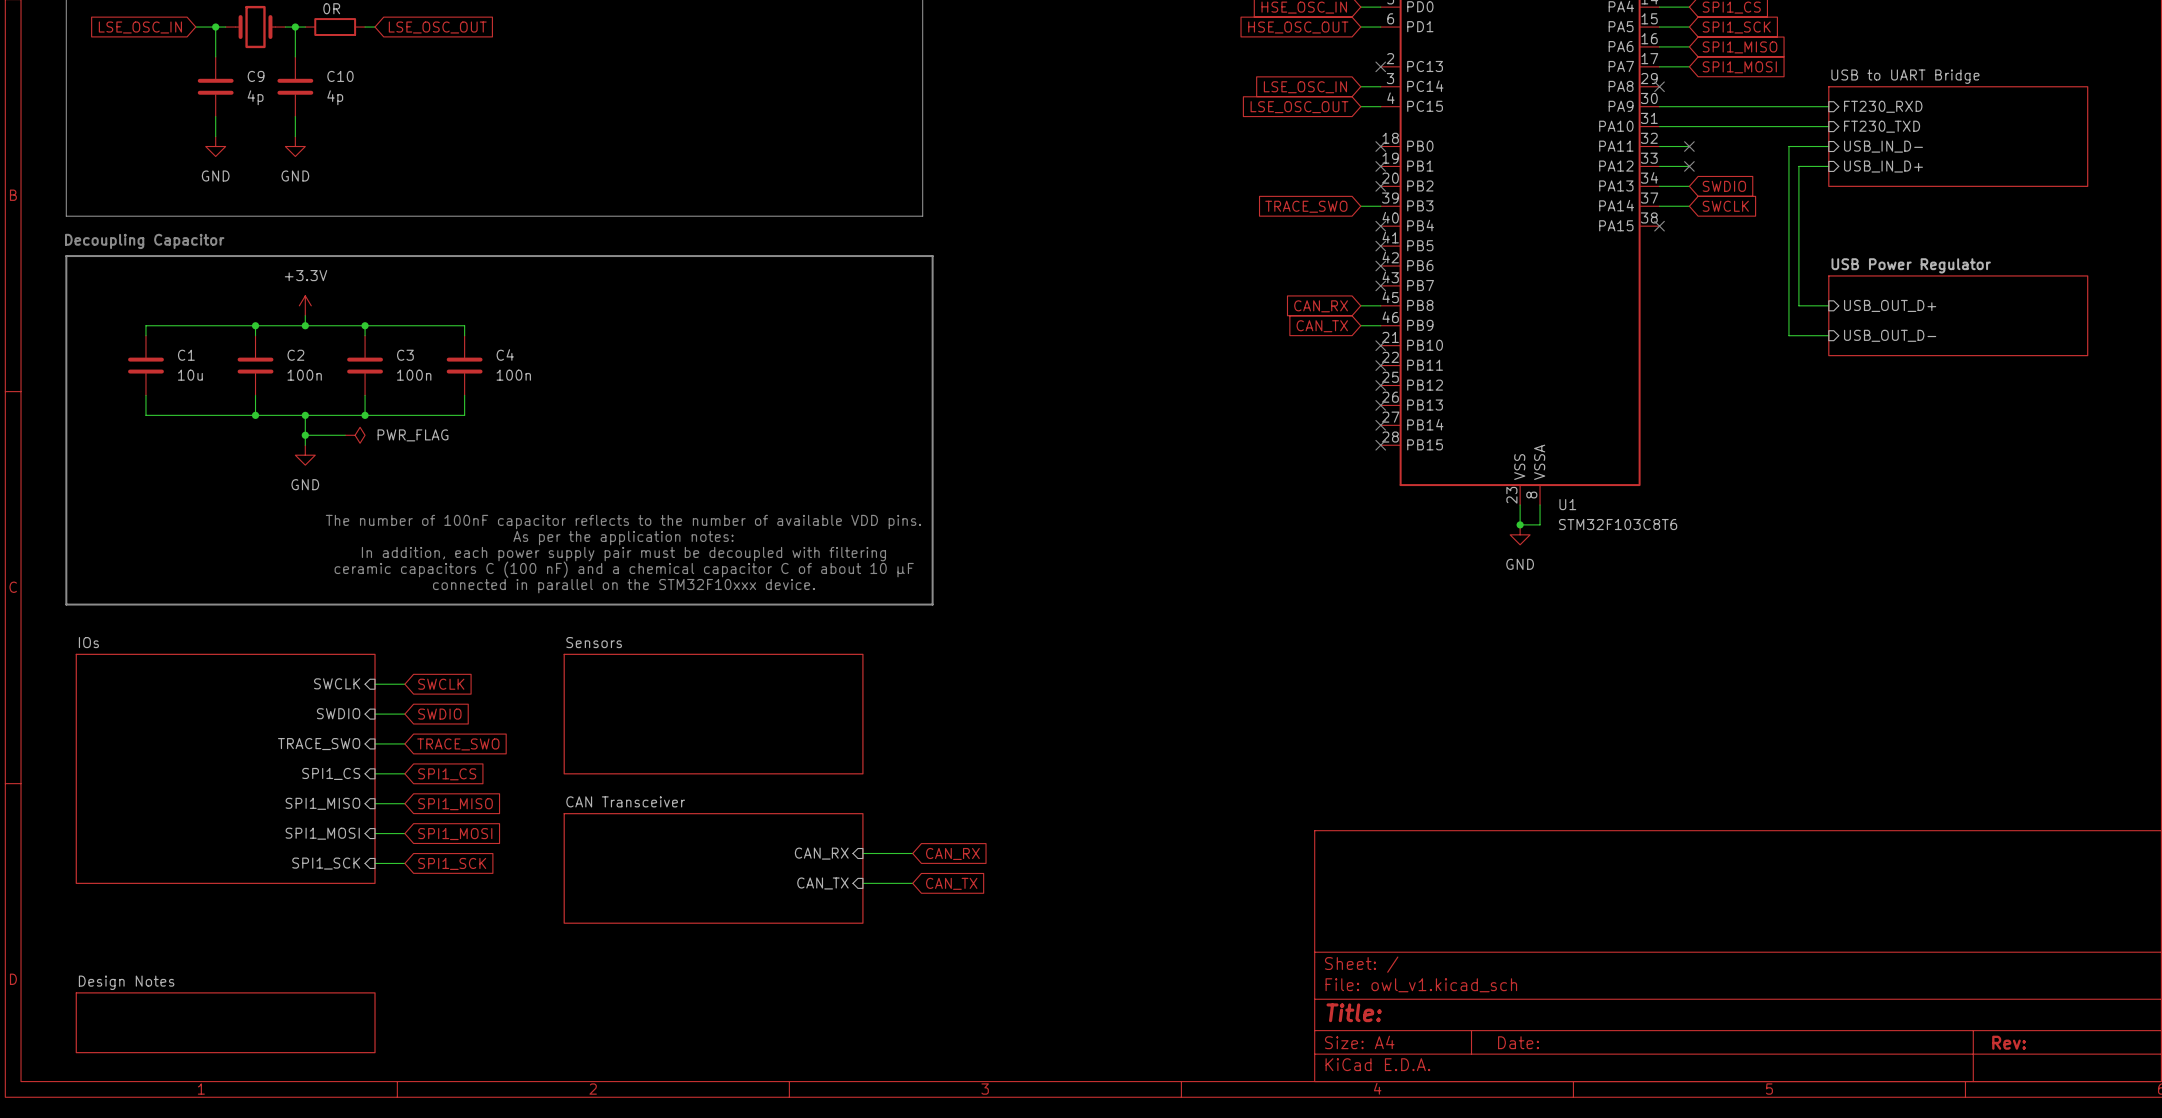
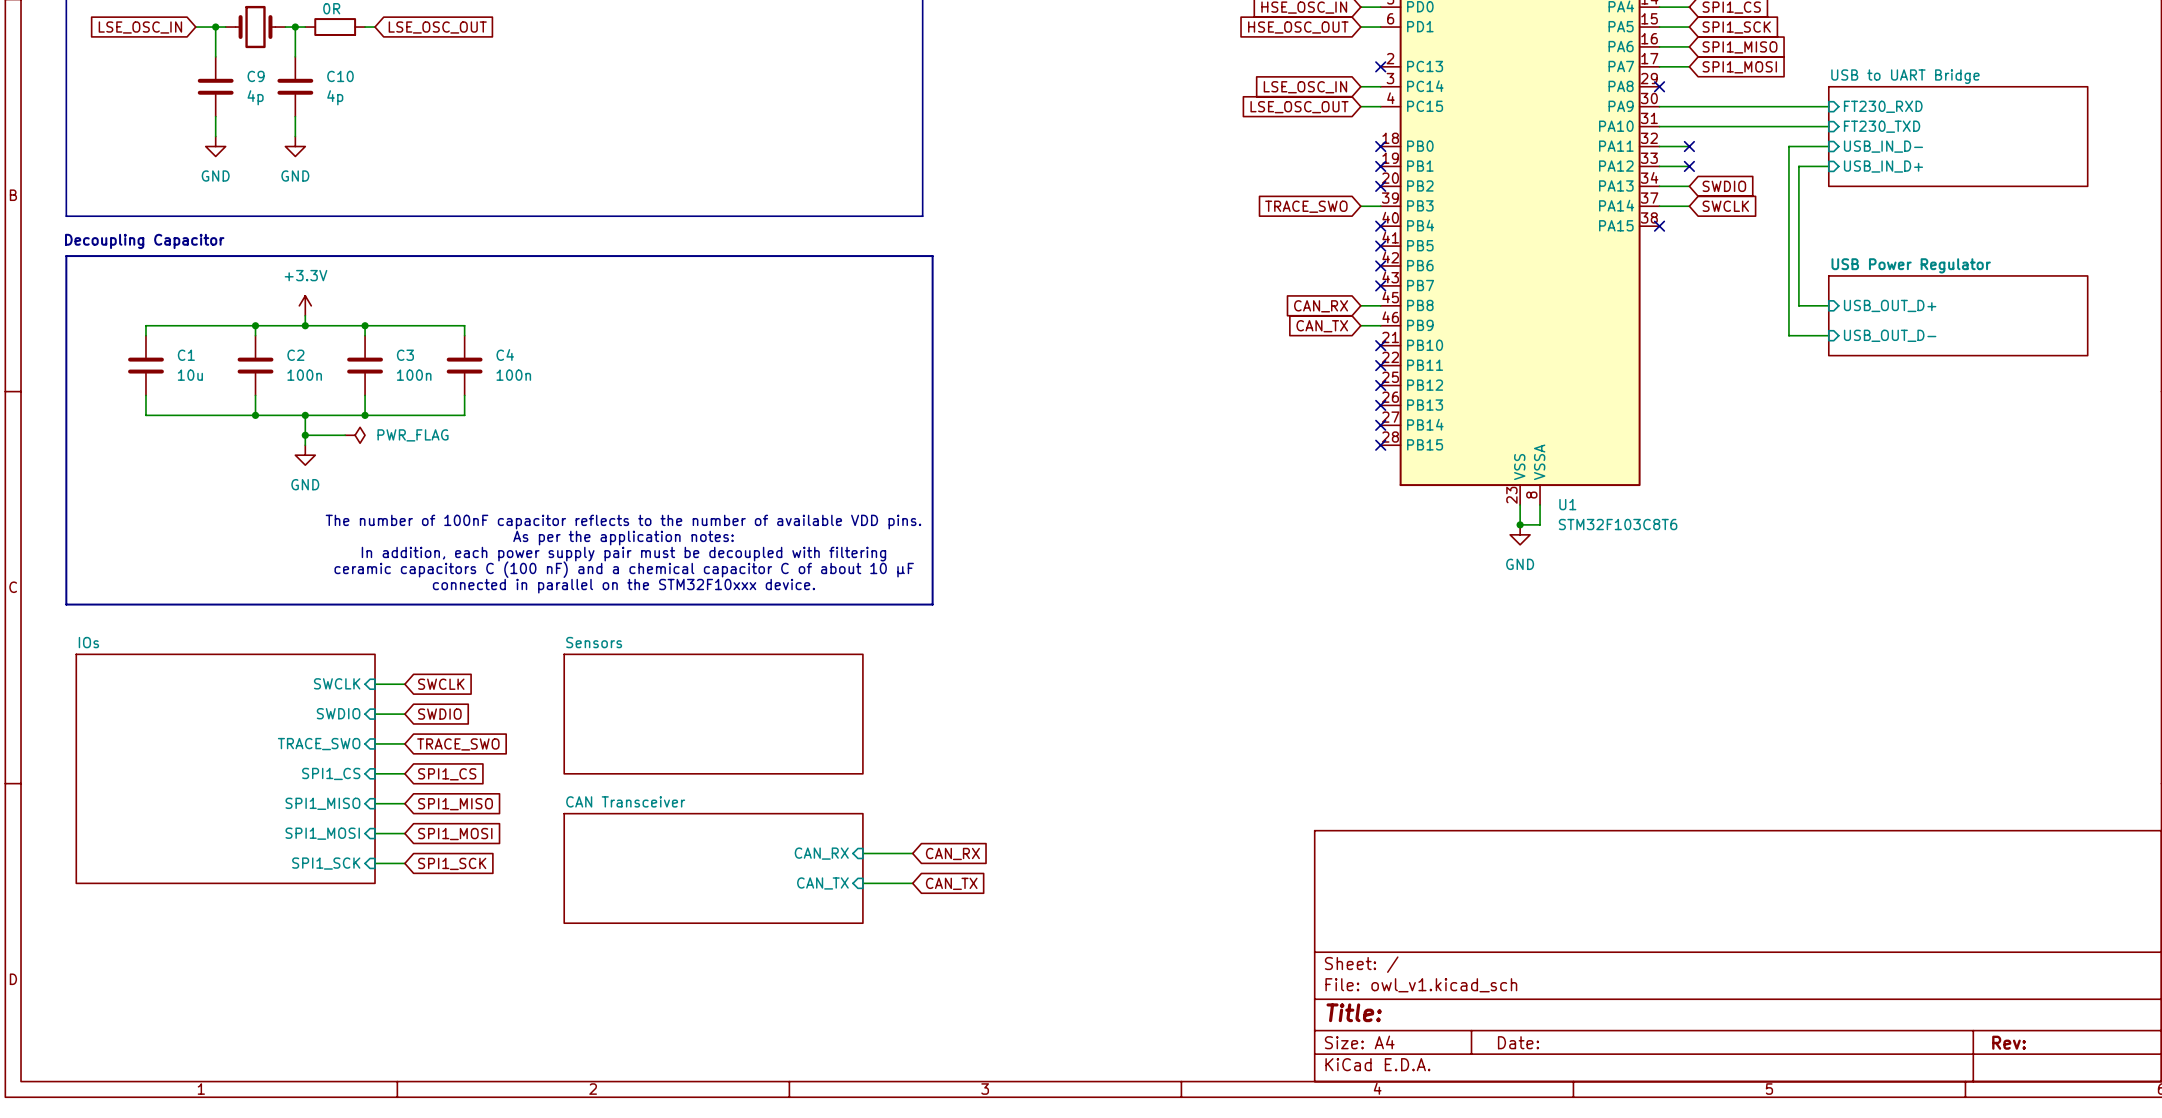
sheet Design Notes: (225, 1022) -> none

